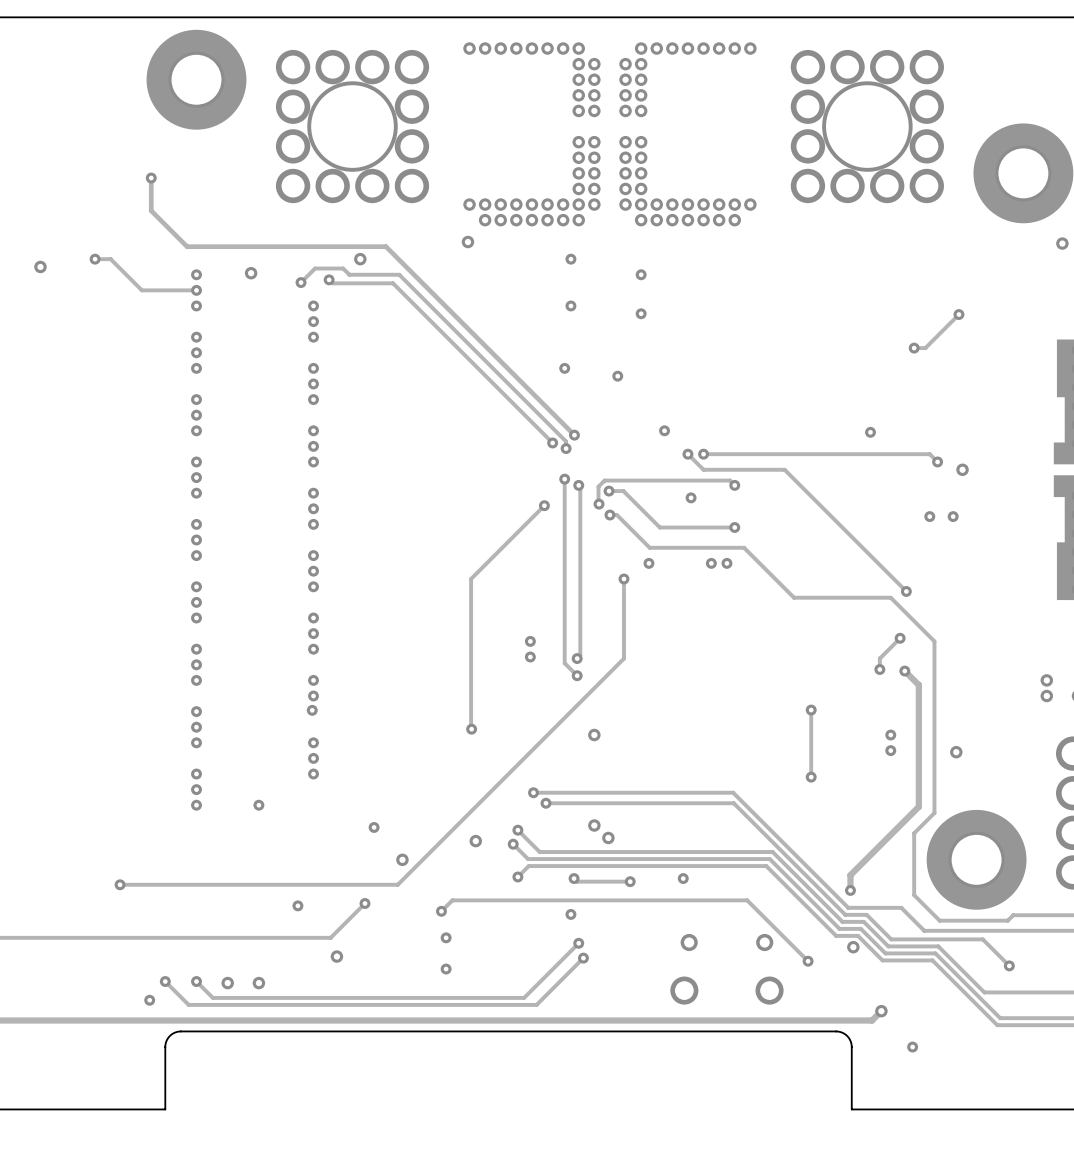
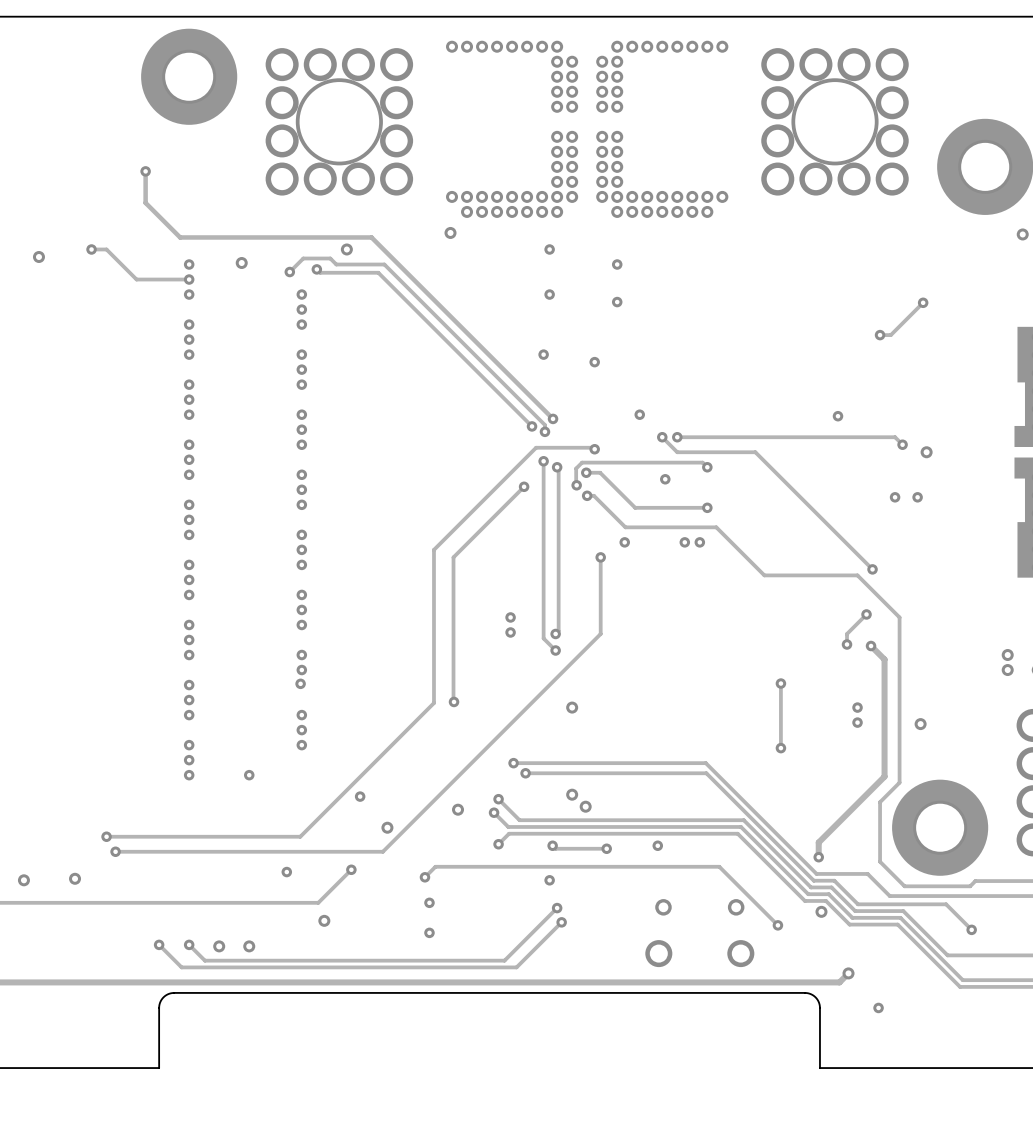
track: none -> (594, 449) (536, 447) (433, 549) (433, 703) (300, 836) (106, 836)
via: none -> (594, 449)
via: none -> (106, 836)
via: none -> (75, 878)
via: none -> (23, 880)
via: (149, 1000) -> none

